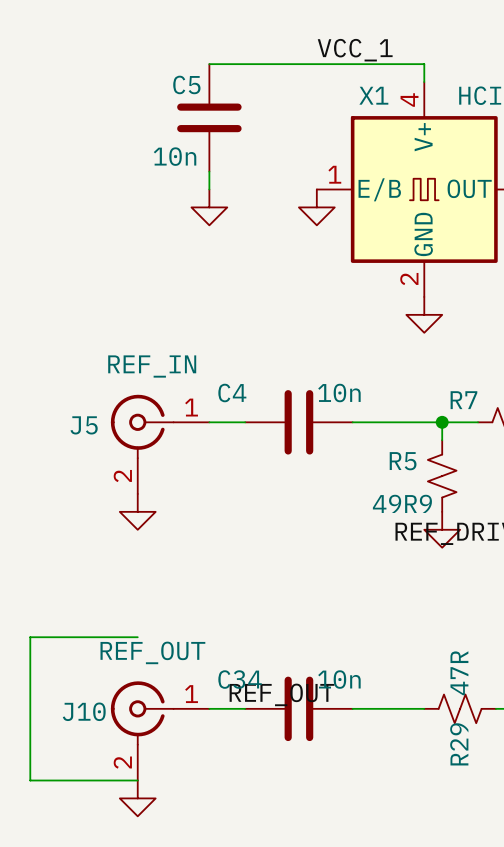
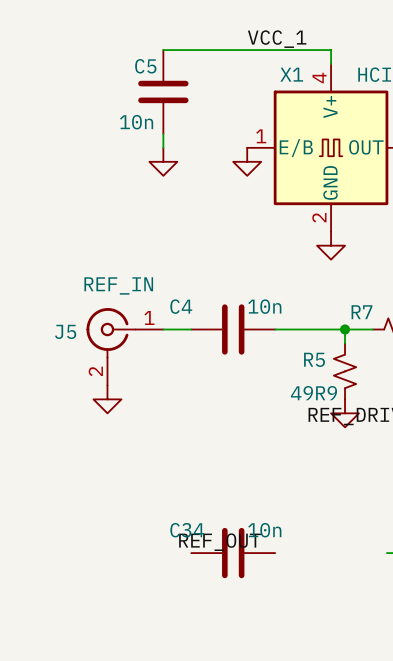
wire: (137, 637) (30, 637) (30, 780) (137, 780) -> none
wire: (209, 708) (245, 708) -> none
wire: (352, 708) (424, 708) -> none
R29: 47R (460, 708) -> none
J10: REF_OUT (160, 730) -> none
power symbol: (137, 798) -> none

